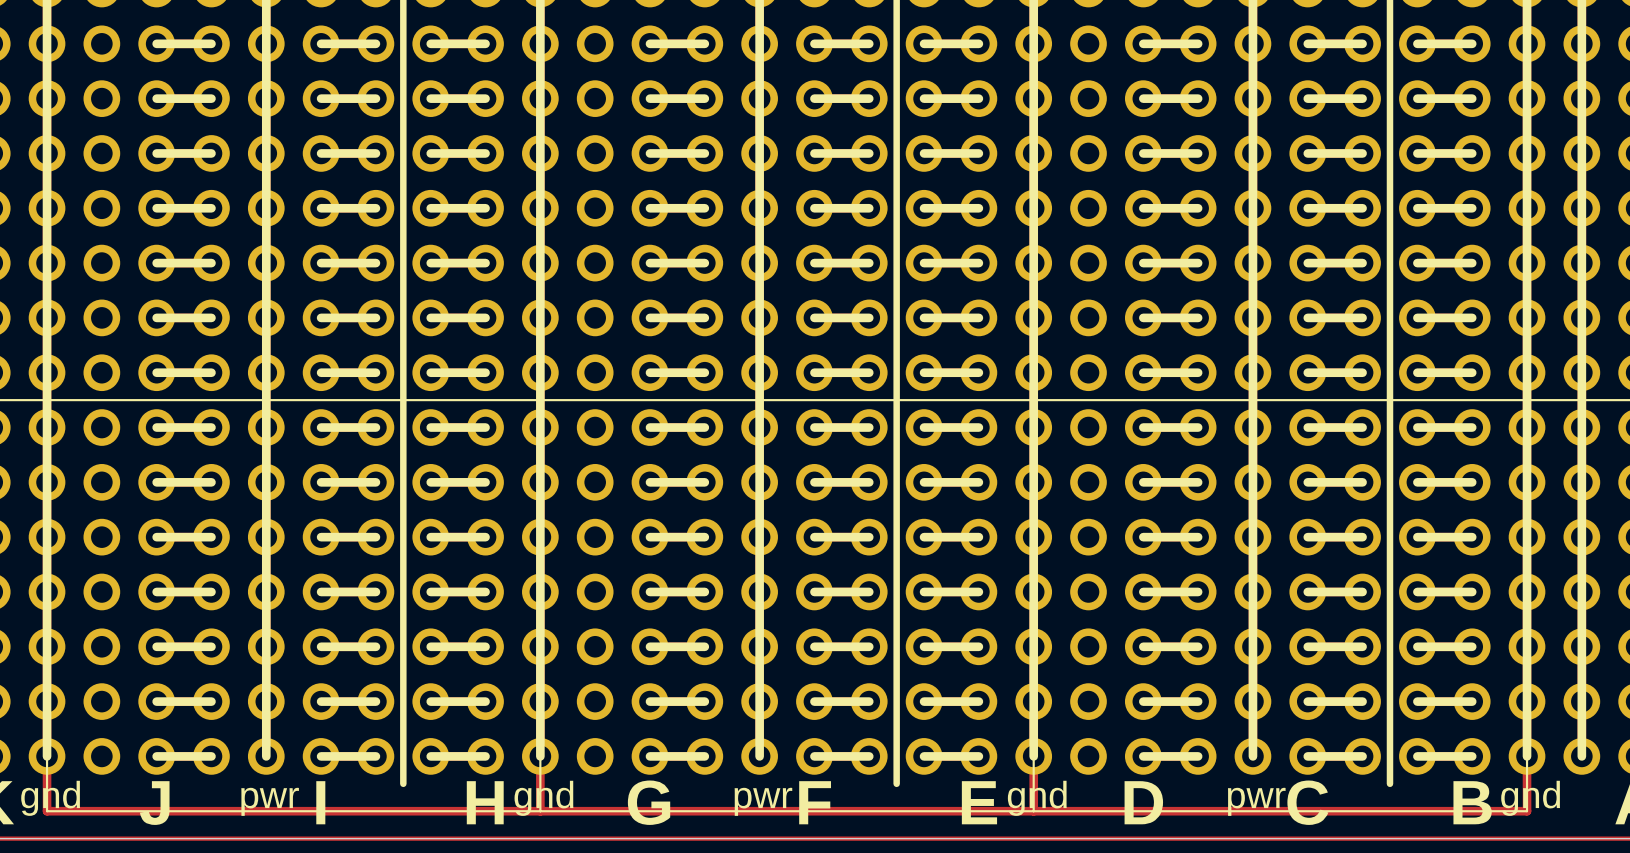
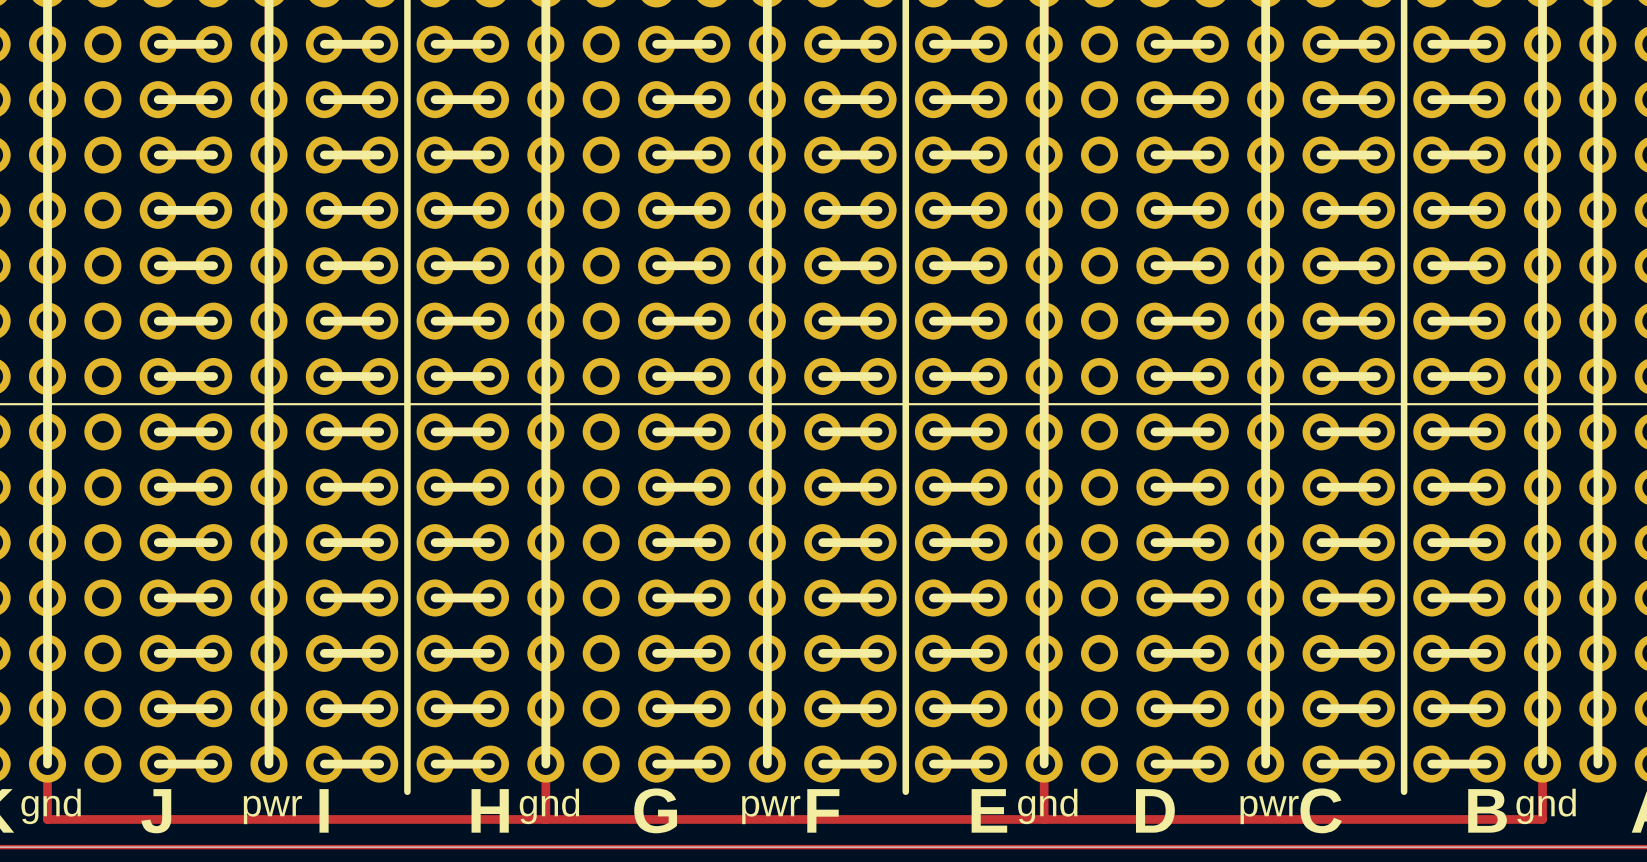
line: (47, 756) (47, 811) (1527, 811) (1527, 756) -> none
line: (540, 756) (540, 811) -> none
line: (1033, 756) (1033, 811) -> none

